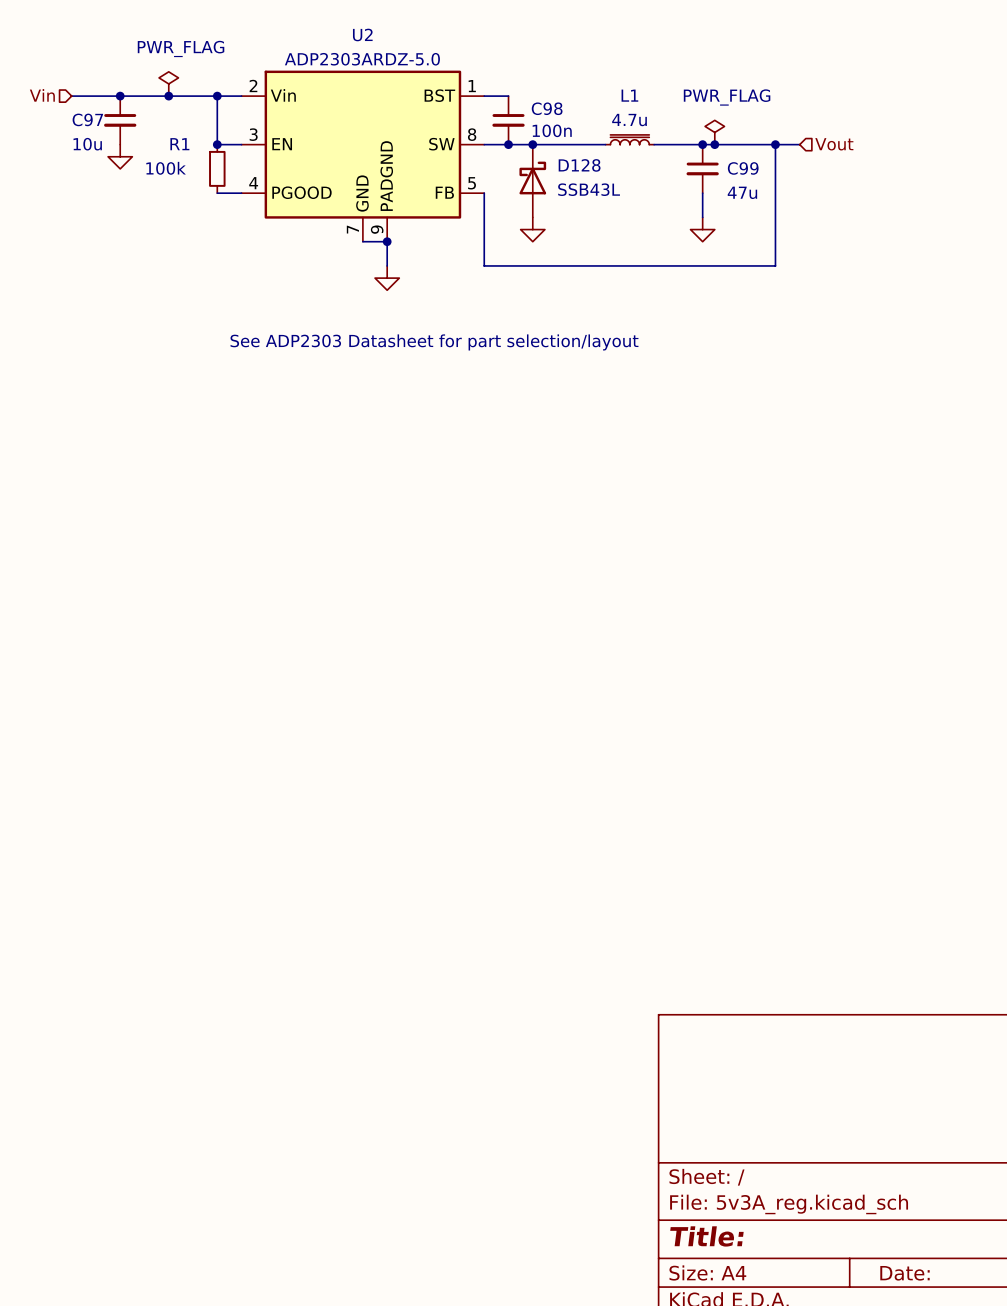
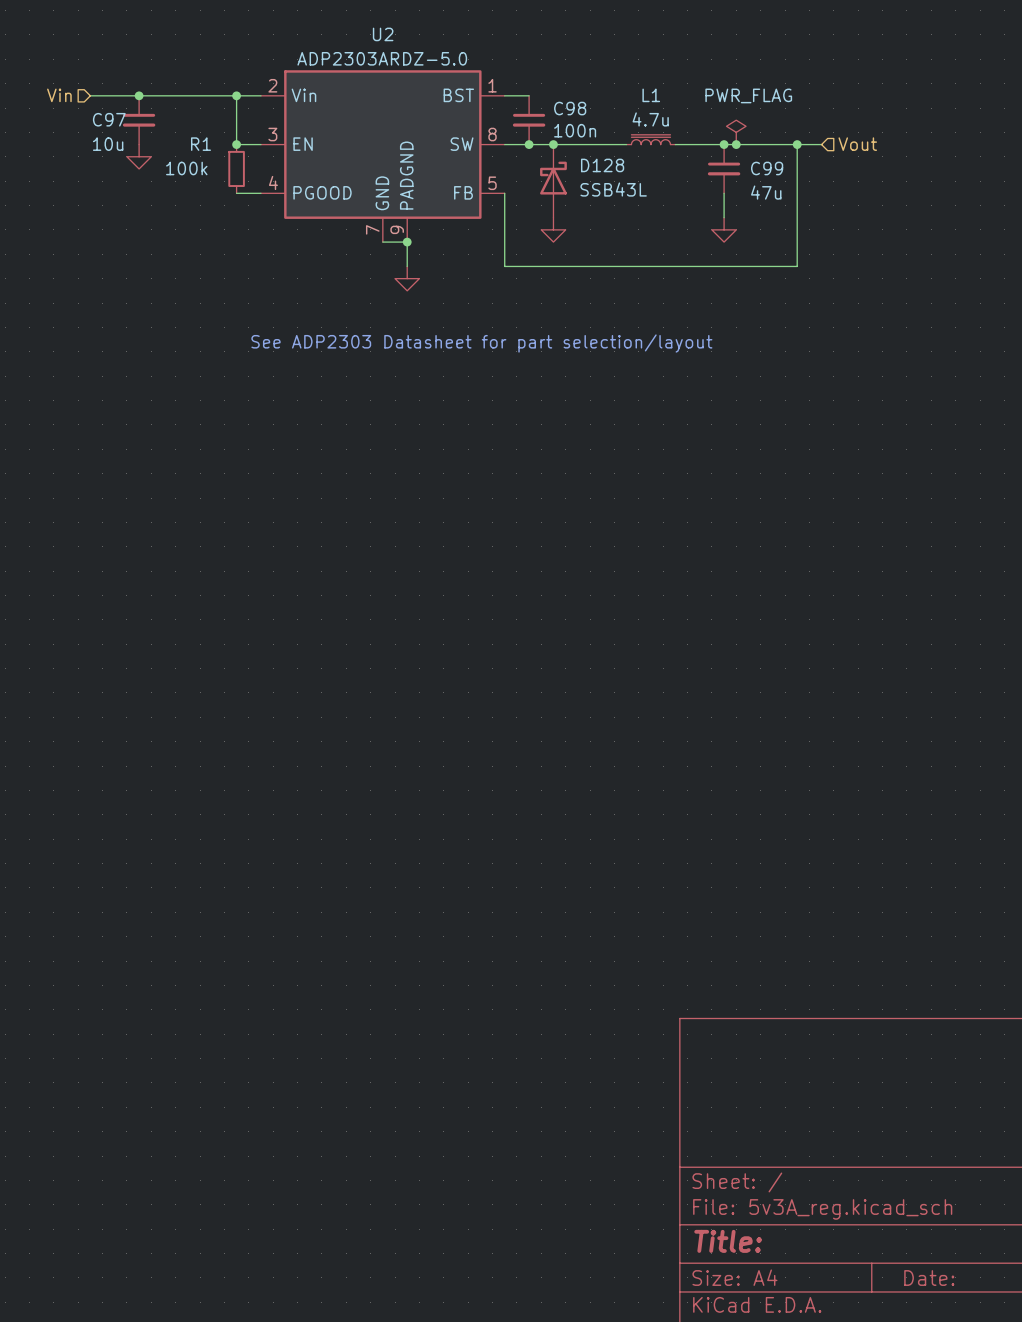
power symbol: PWR_FLAG (168, 83) -> none
junction: (168, 96) -> none

